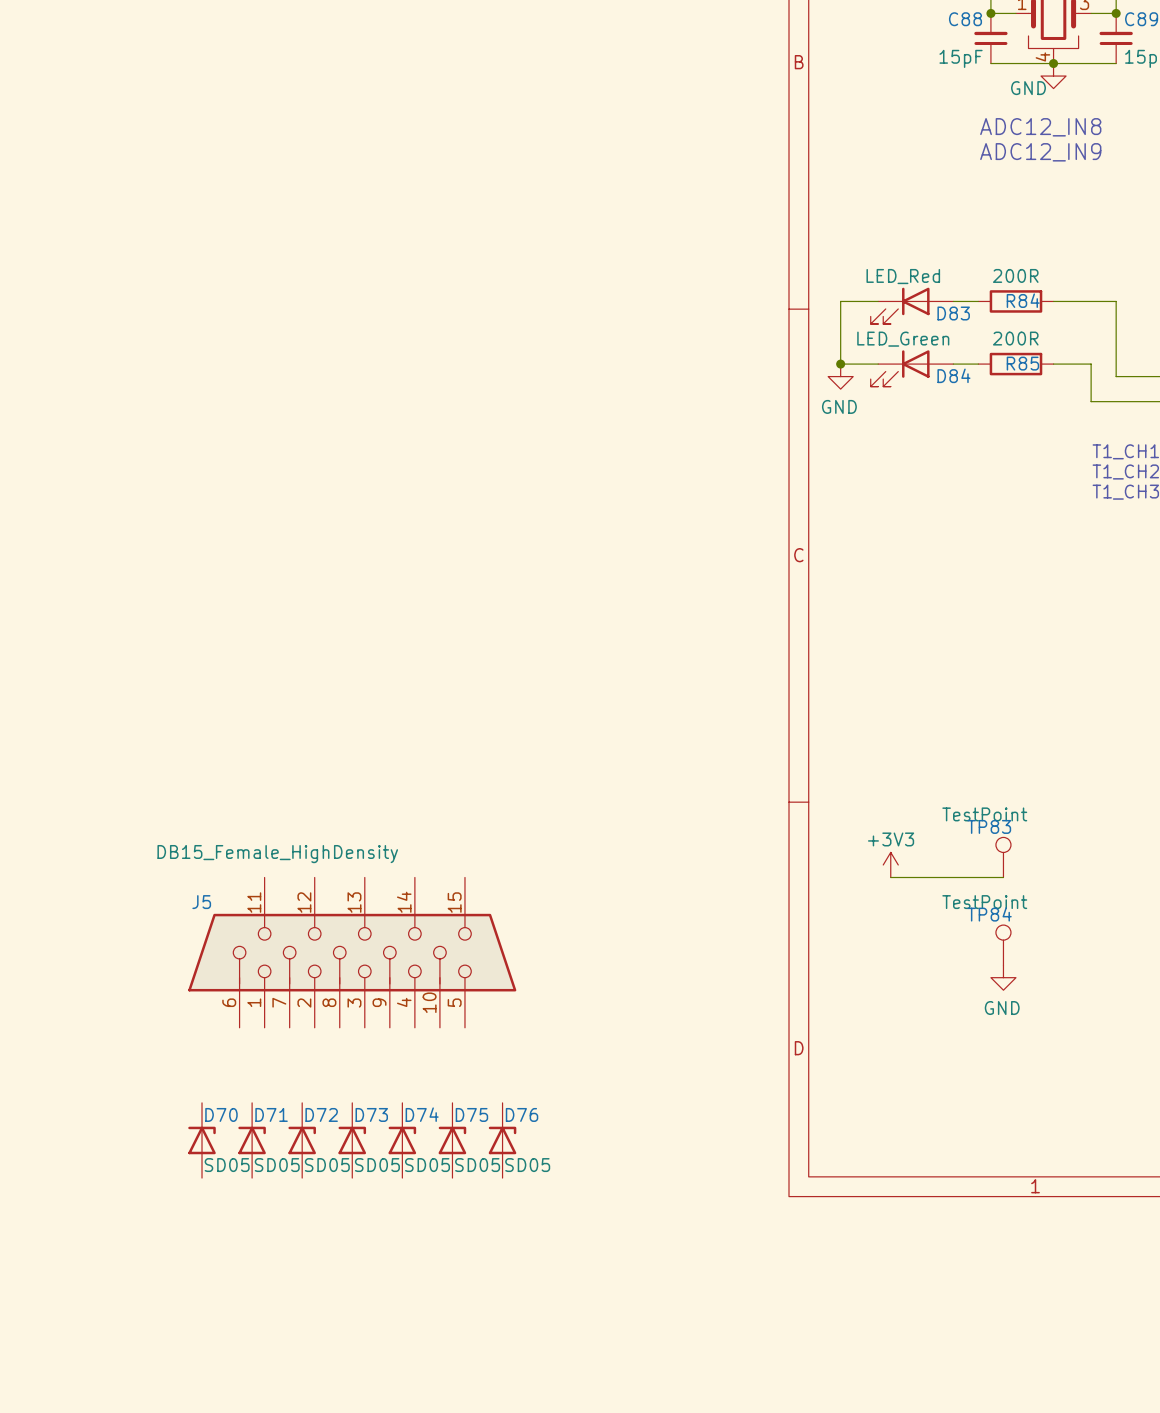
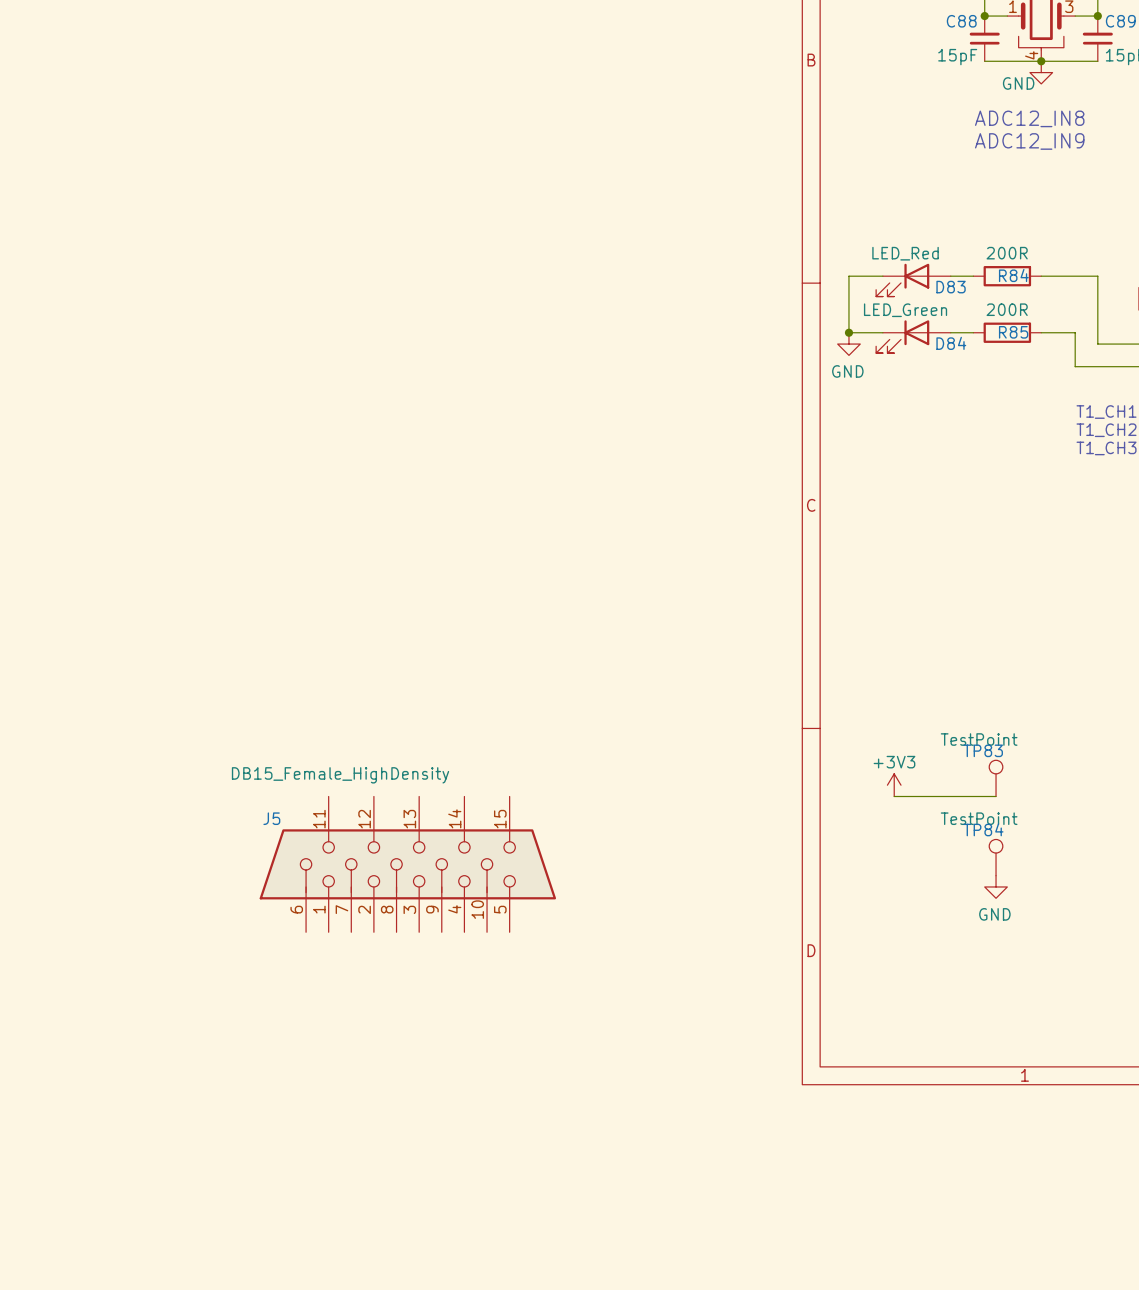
D70: SD05 (202, 1140) -> none
D71: SD05 (252, 1140) -> none
D72: SD05 (302, 1140) -> none
D73: SD05 (352, 1140) -> none
D74: SD05 (402, 1140) -> none
D75: SD05 (452, 1140) -> none
D76: SD05 (502, 1140) -> none

